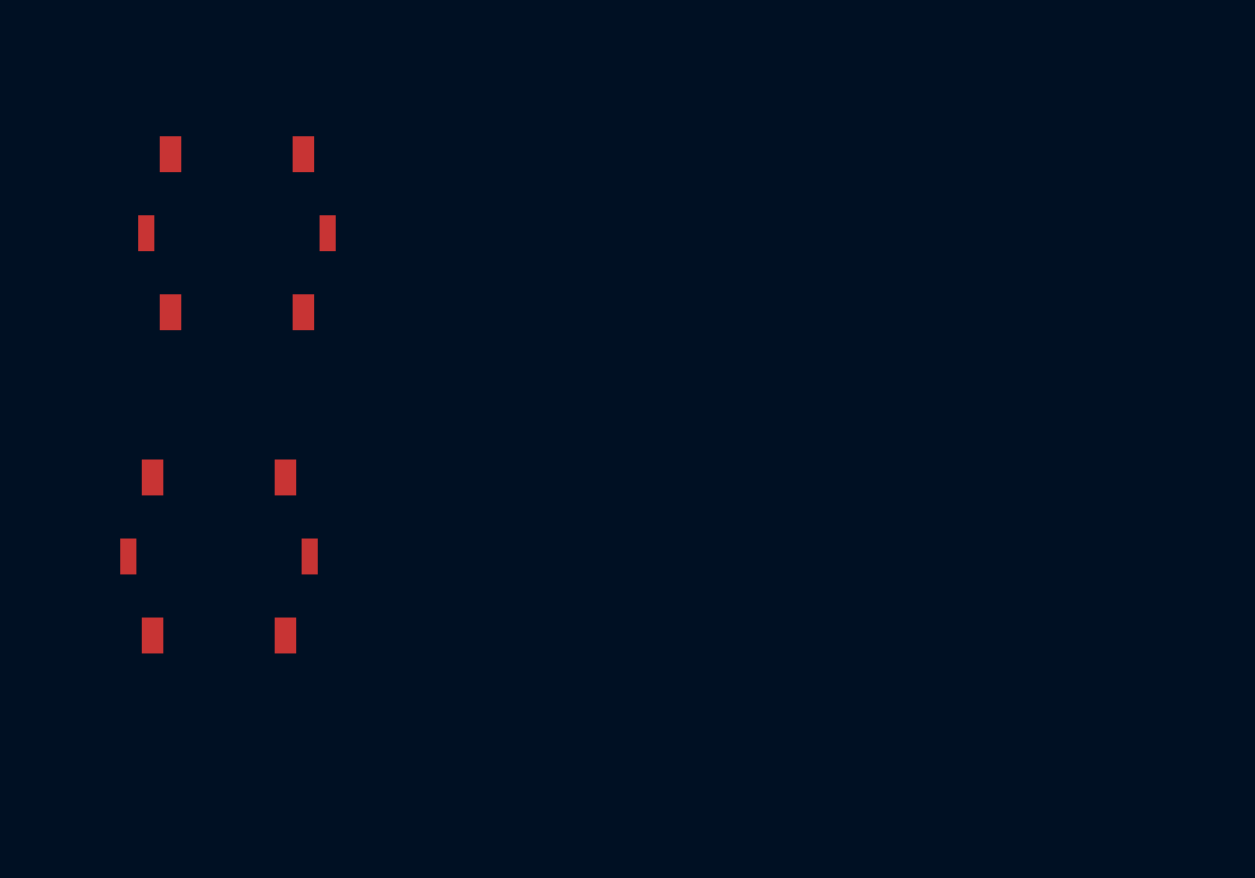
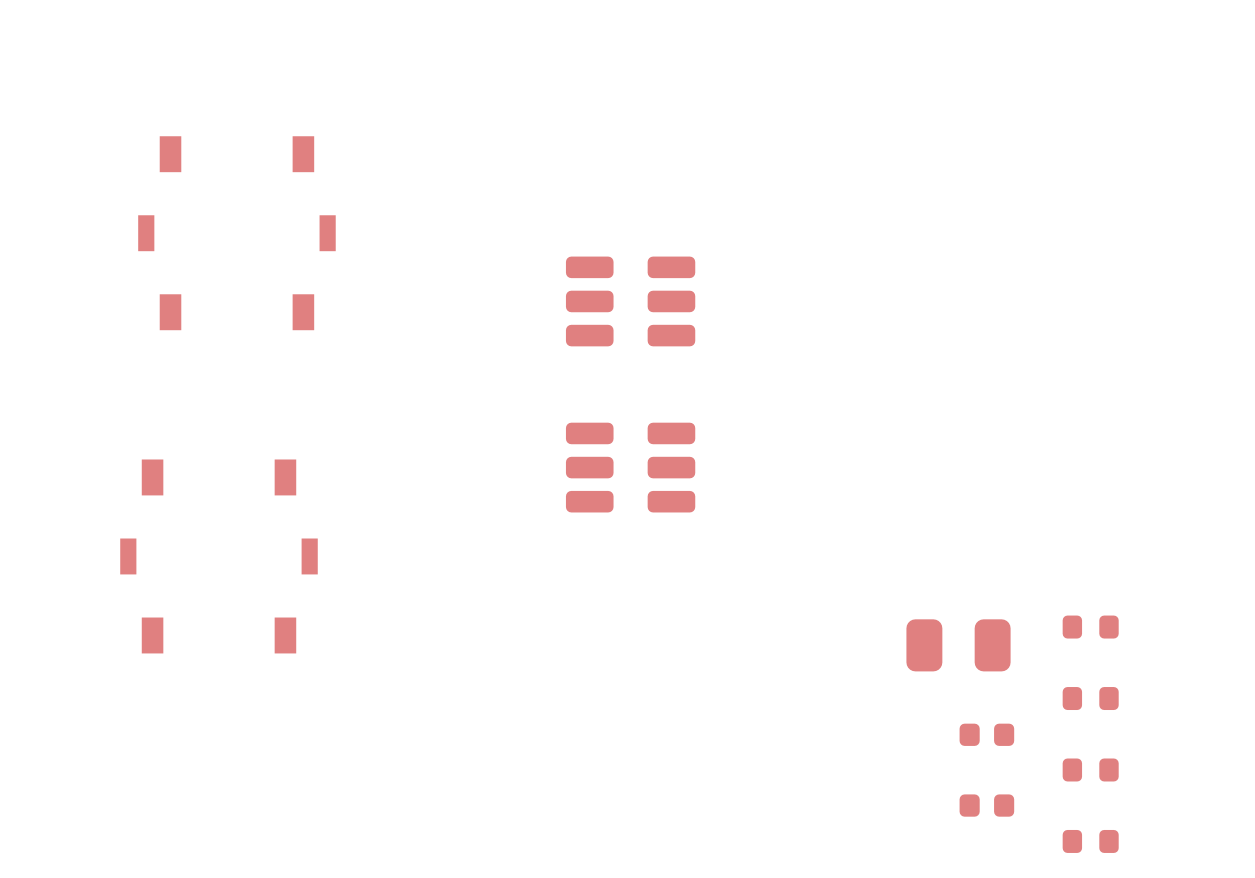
part: none -> (630, 301)
part: none -> (630, 467)
part: none -> (1090, 627)
part: none -> (958, 645)
part: none -> (1090, 698)
part: none -> (986, 734)
part: none -> (1090, 769)
part: none -> (986, 805)
part: none -> (1090, 841)

